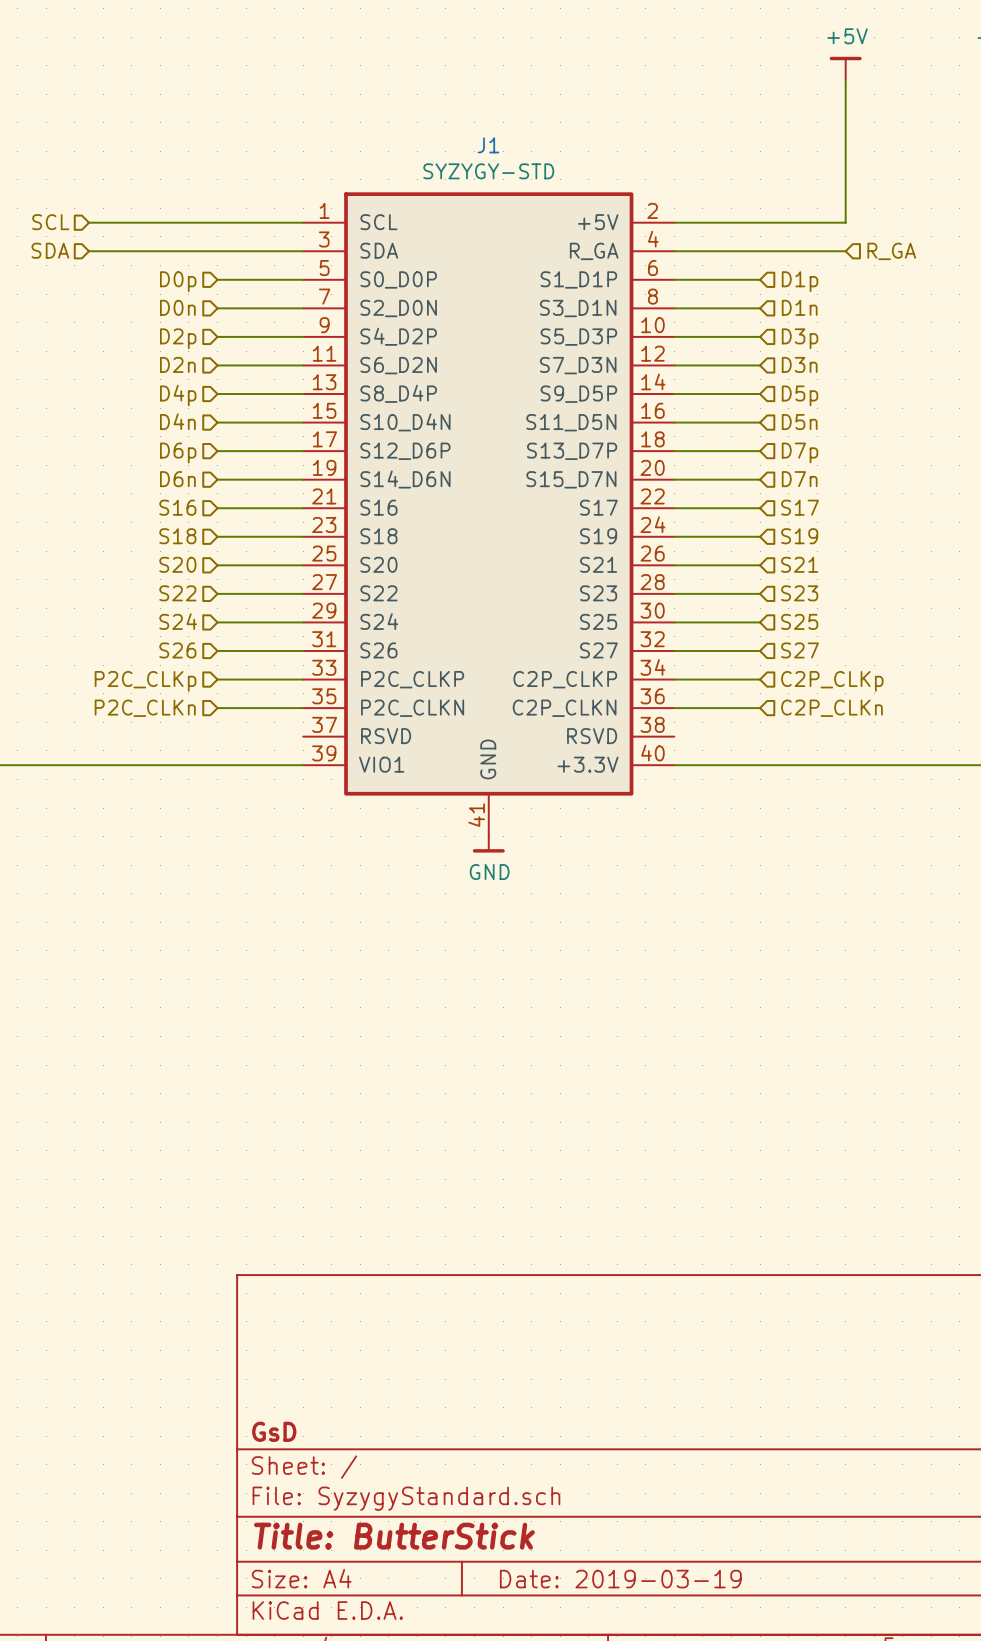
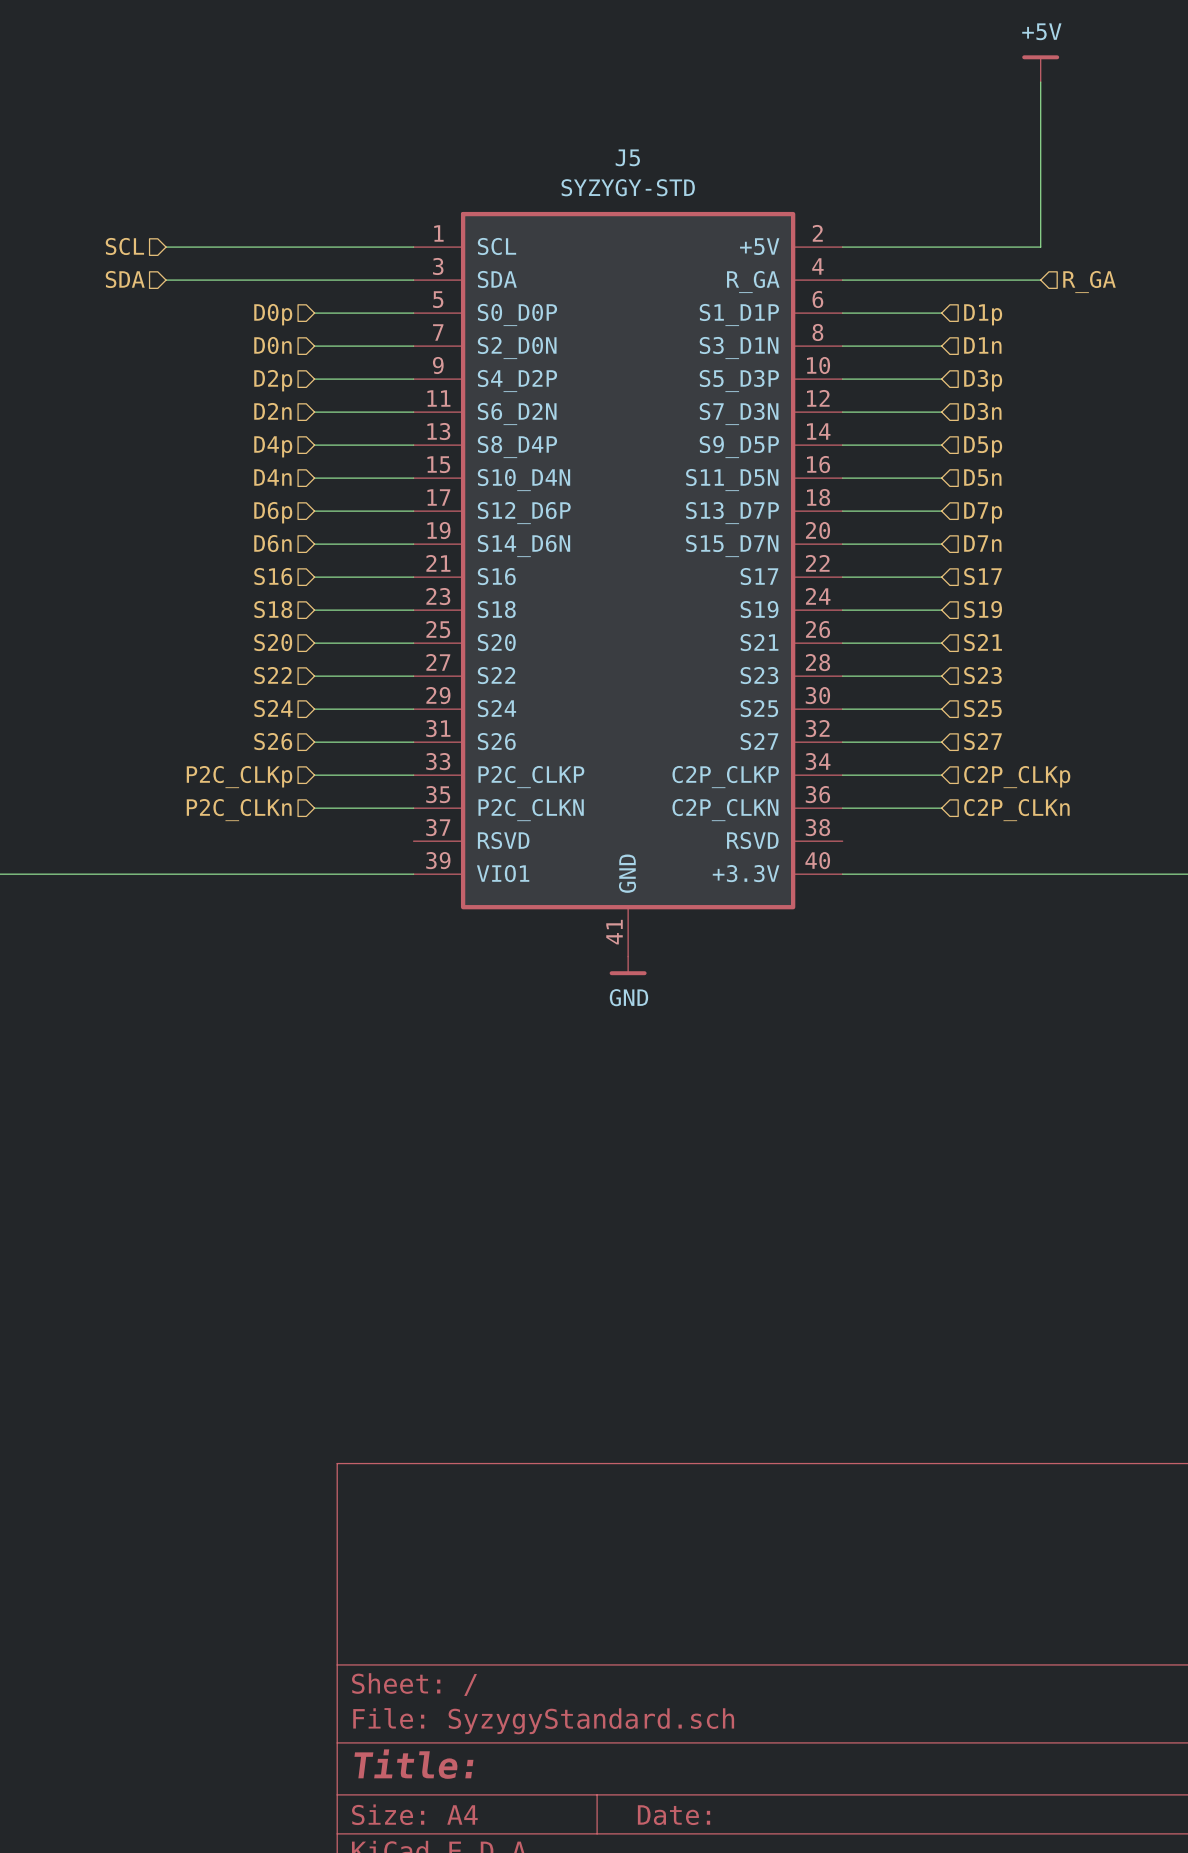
J1 name: J1 (488, 145) -> J5 (627, 157)
title block: GsD (274, 1431) -> none
title block: Title: ButterStick (394, 1536) -> Title: (413, 1764)
title block: Date: 2019-03-19 (620, 1579) -> Date: (674, 1815)

